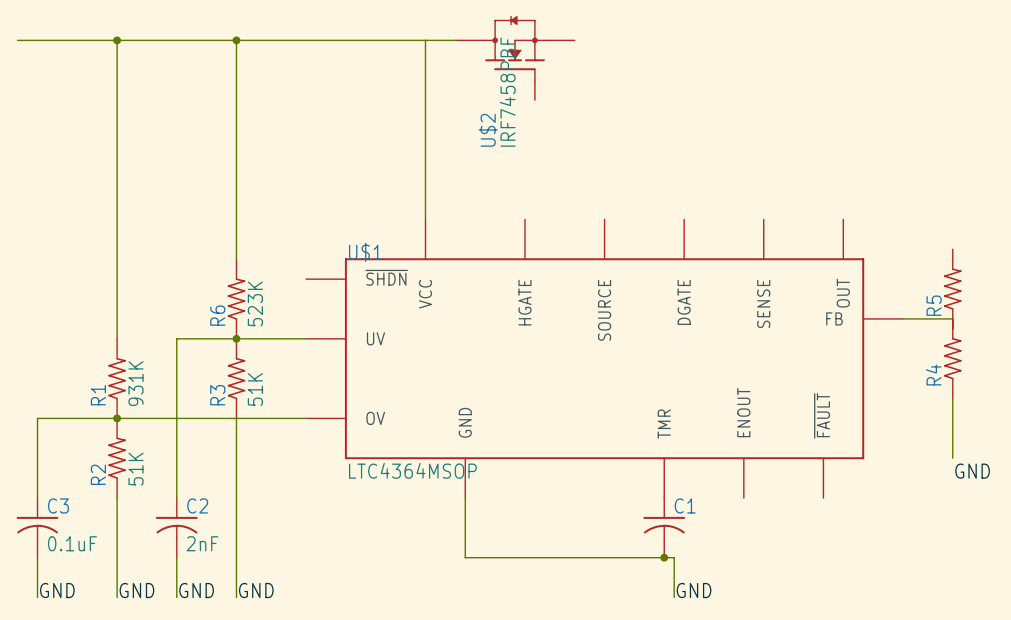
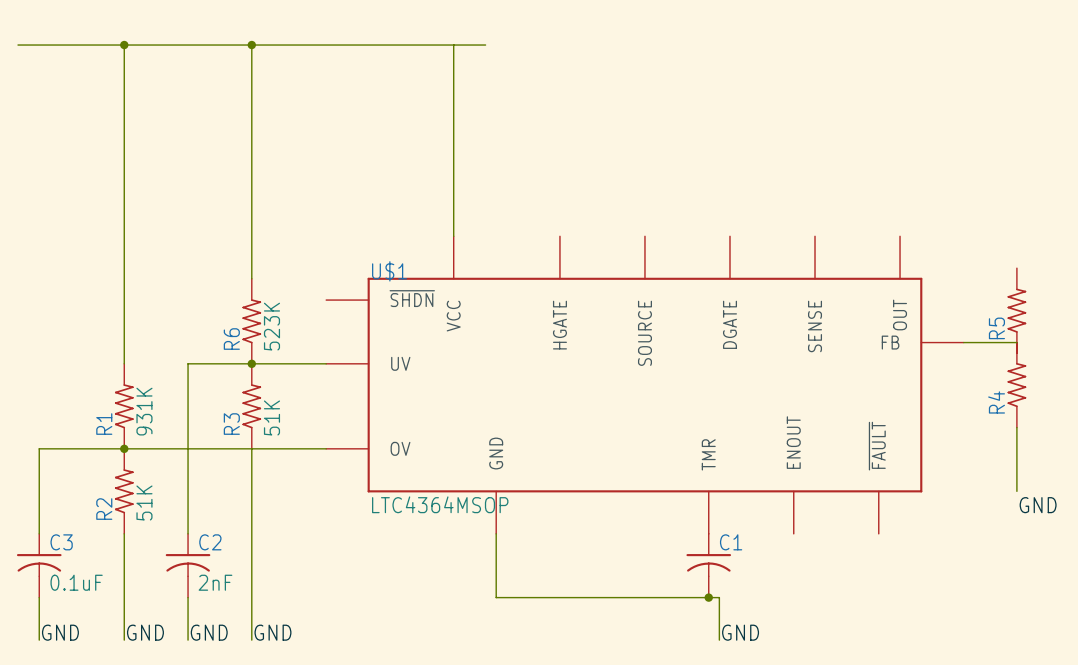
U$2: IRF7458PBF (515, 58) -> none

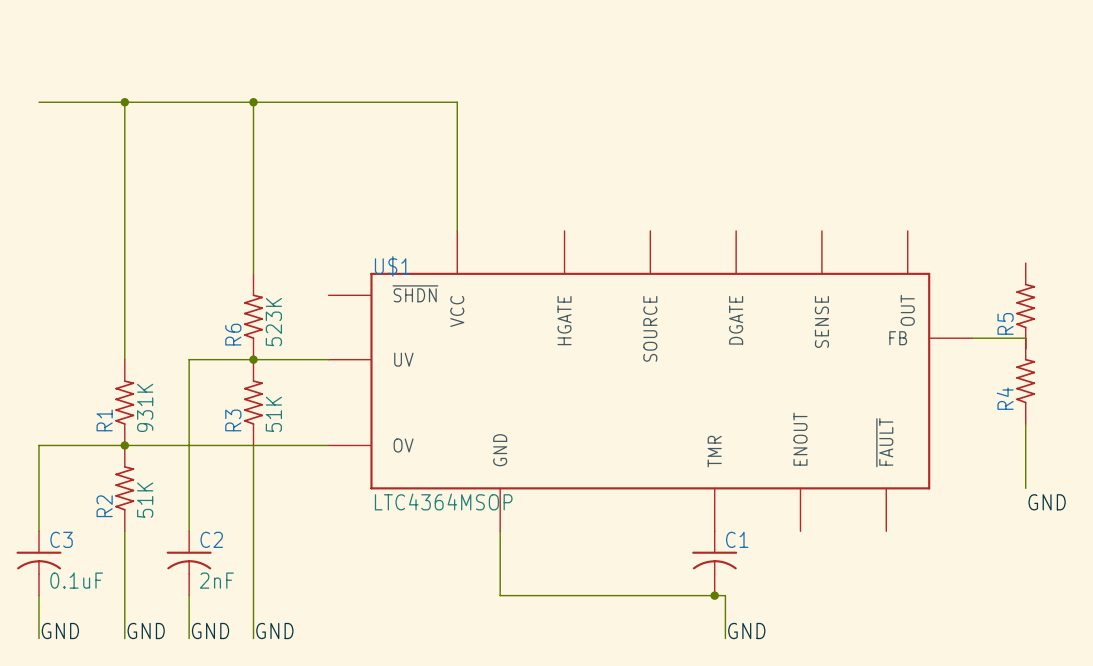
wire: (18, 45) (485, 45) -> none
wire: (124, 45) (124, 108) -> none
junction: (124, 45) -> none
wire: (251, 45) (251, 108) -> none
junction: (251, 45) -> none
wire: (453, 45) (453, 108) -> (38, 102) (457, 102)
junction: none -> (124, 102)
junction: none -> (253, 102)

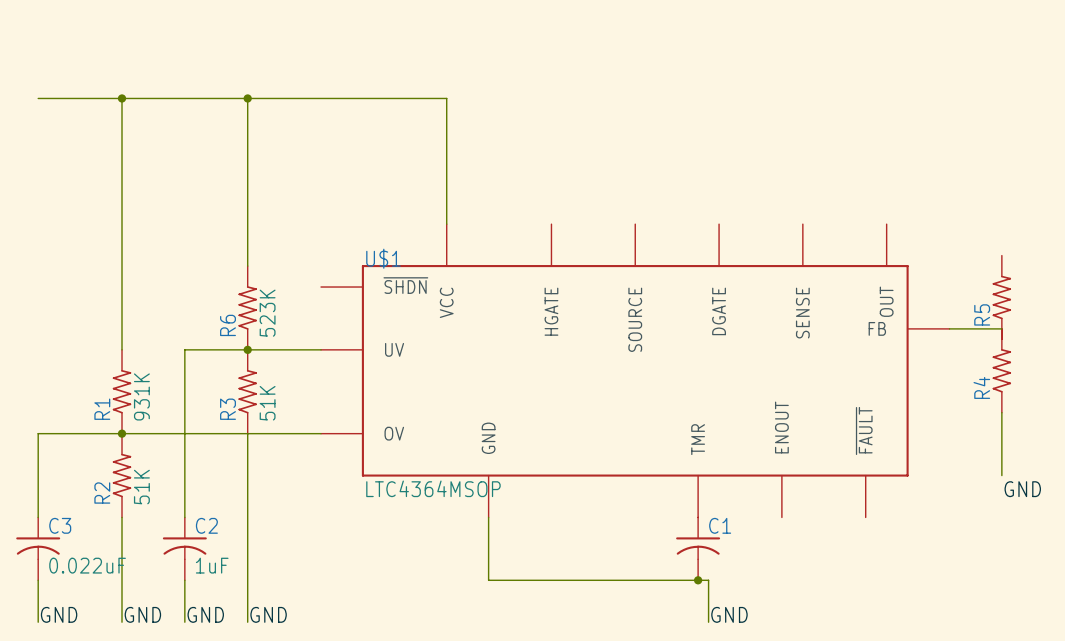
C3 value: 0.1uF (76, 580) -> 0.022uF (87, 565)
C2 value: 2nF (216, 580) -> 1uF (212, 565)

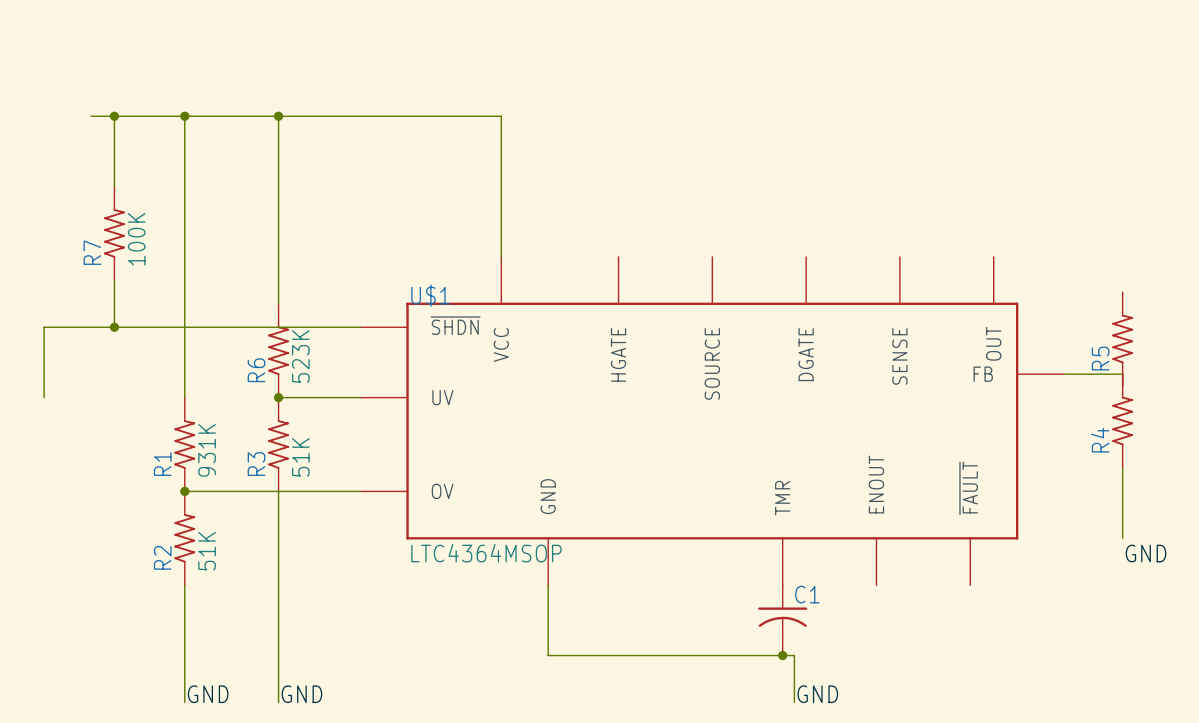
wire: (38, 98) (80, 98) -> none
wire: none -> (114, 116) (114, 186)
junction: none -> (114, 116)
wire: (122, 98) (122, 349) -> (184, 116) (184, 397)
junction: (122, 98) -> none
junction: none -> (184, 116)
R7: none -> 100K (114, 233)
wire: none -> (114, 280) (114, 327)
junction: none -> (114, 327)
wire: none -> (360, 327) (44, 327) (44, 397)
wire: (247, 349) (184, 349) (184, 517) -> none
R1 position: (122, 391) -> (184, 444)
junction position: (122, 433) -> (184, 491)
wire: (163, 433) (38, 433) (38, 517) -> none
R2 position: (122, 475) -> (184, 538)
wire: (122, 517) (122, 622) -> (184, 585) (184, 702)
C3: 0.022uF (38, 548) -> none
C2: 1uF (184, 548) -> none
wire: (38, 580) (38, 622) -> none
wire: (184, 580) (184, 622) -> none
label: GND (59, 614) -> none
label: GND (142, 614) -> none
label: none -> GND (208, 694)
label: GND (205, 614) -> none

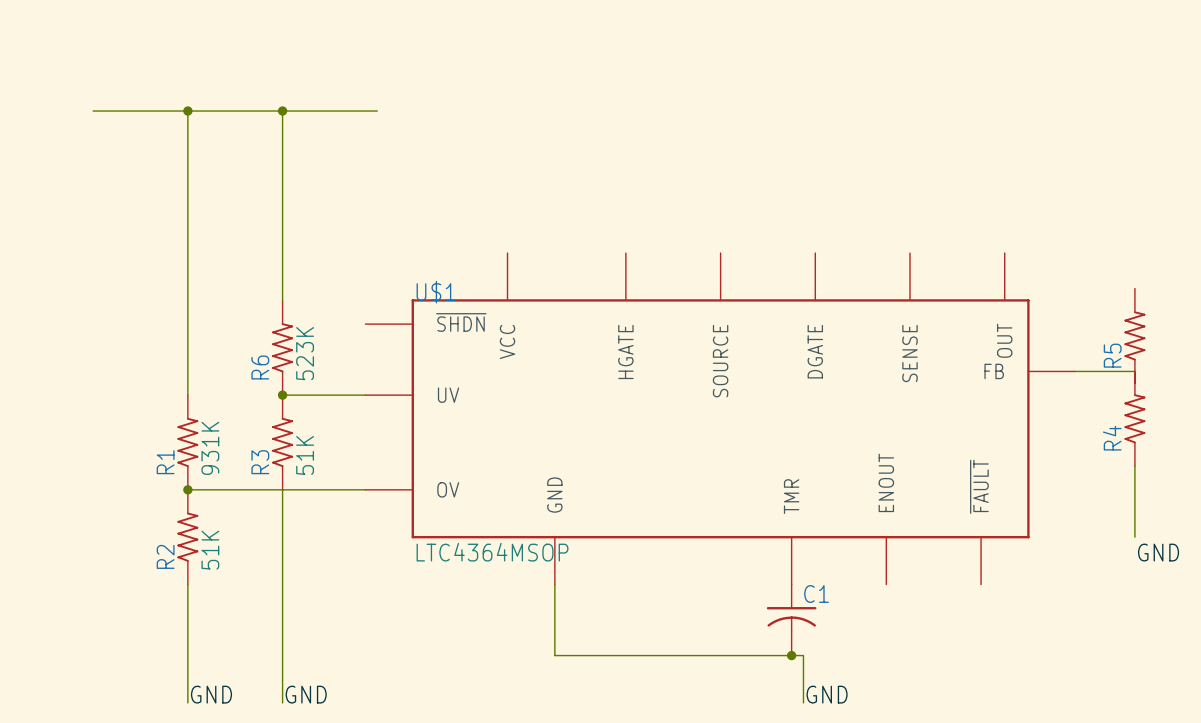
wire: (114, 116) (114, 186) -> none
junction: (114, 116) -> none
wire: (372, 116) (501, 116) (501, 256) -> none
R7: 100K (114, 233) -> none
wire: (114, 280) (114, 327) -> none
junction: (114, 327) -> none
wire: (360, 327) (44, 327) (44, 397) -> none

